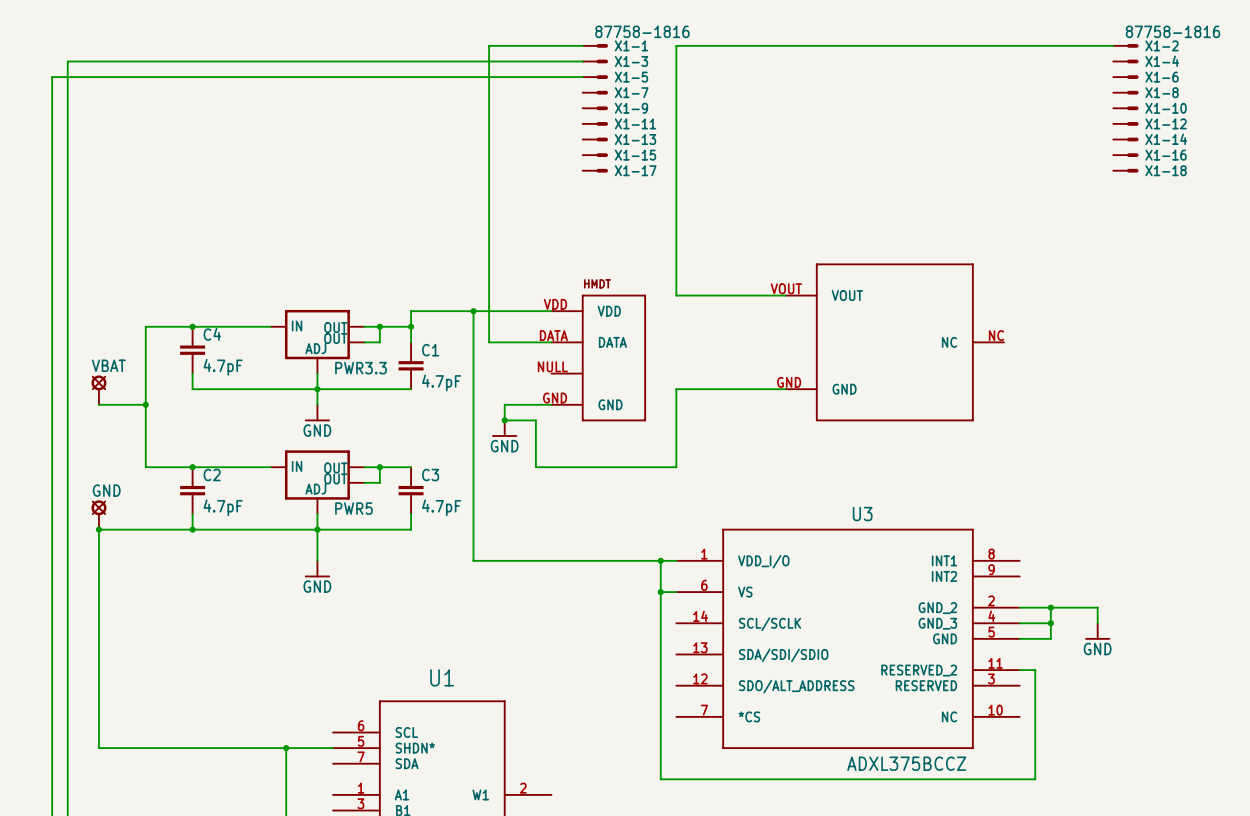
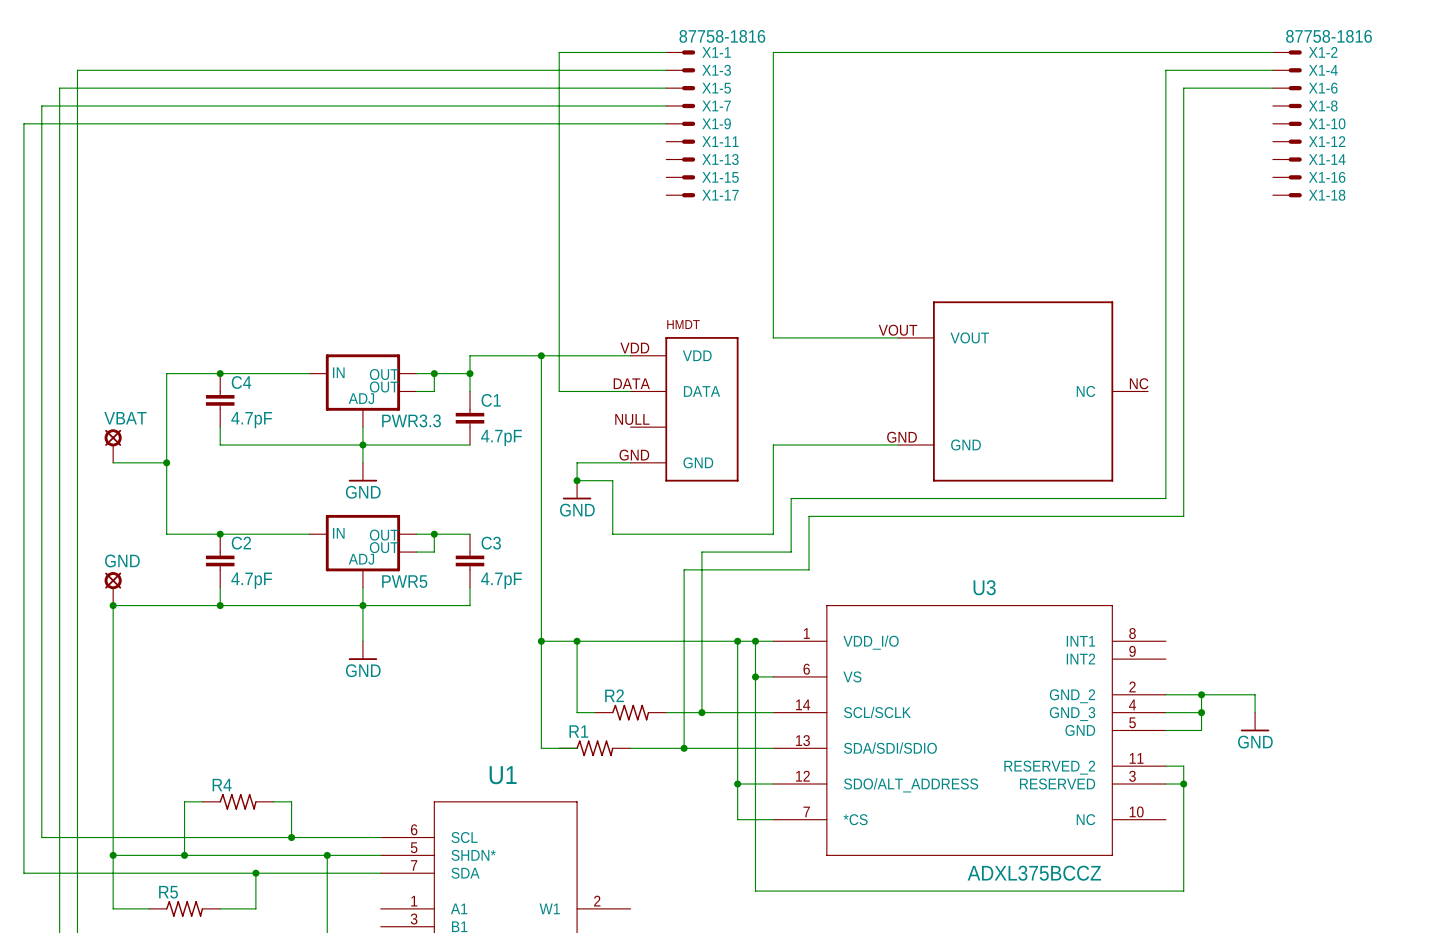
wire: none -> (1272, 70) (1165, 70) (1165, 498) (791, 498) (791, 552) (701, 552) (701, 712)
wire: none -> (1272, 88) (1183, 88) (1183, 516) (809, 516) (809, 569) (684, 569) (684, 748)
wire: none -> (666, 105) (41, 105) (41, 837) (380, 837)
wire: none -> (666, 123) (23, 123) (23, 873) (380, 873)
wire: none -> (541, 641) (541, 748) (577, 748)
junction: none -> (541, 641)
wire: none -> (577, 641) (577, 712) (594, 712)
junction: none -> (577, 641)
wire: none -> (737, 641) (737, 819) (773, 819)
junction: none -> (737, 641)
R2: none -> (630, 712)
wire: none -> (666, 712) (773, 712)
junction: none -> (701, 712)
R1: none -> (594, 748)
wire: none -> (630, 748) (773, 748)
junction: none -> (684, 748)
wire: none -> (737, 784) (773, 784)
junction: none -> (737, 784)
wire: none -> (1165, 784) (1183, 784)
junction: none -> (1183, 784)
wire: none -> (202, 801) (184, 801) (184, 855)
R4: none -> (238, 801)
wire: none -> (273, 801) (291, 801) (291, 837)
junction: none -> (291, 837)
wire: none -> (113, 855) (113, 908) (148, 908)
junction: none -> (113, 855)
junction: none -> (184, 855)
wire: none -> (255, 873) (255, 908) (220, 908)
junction: none -> (255, 873)
R5: none -> (184, 908)

